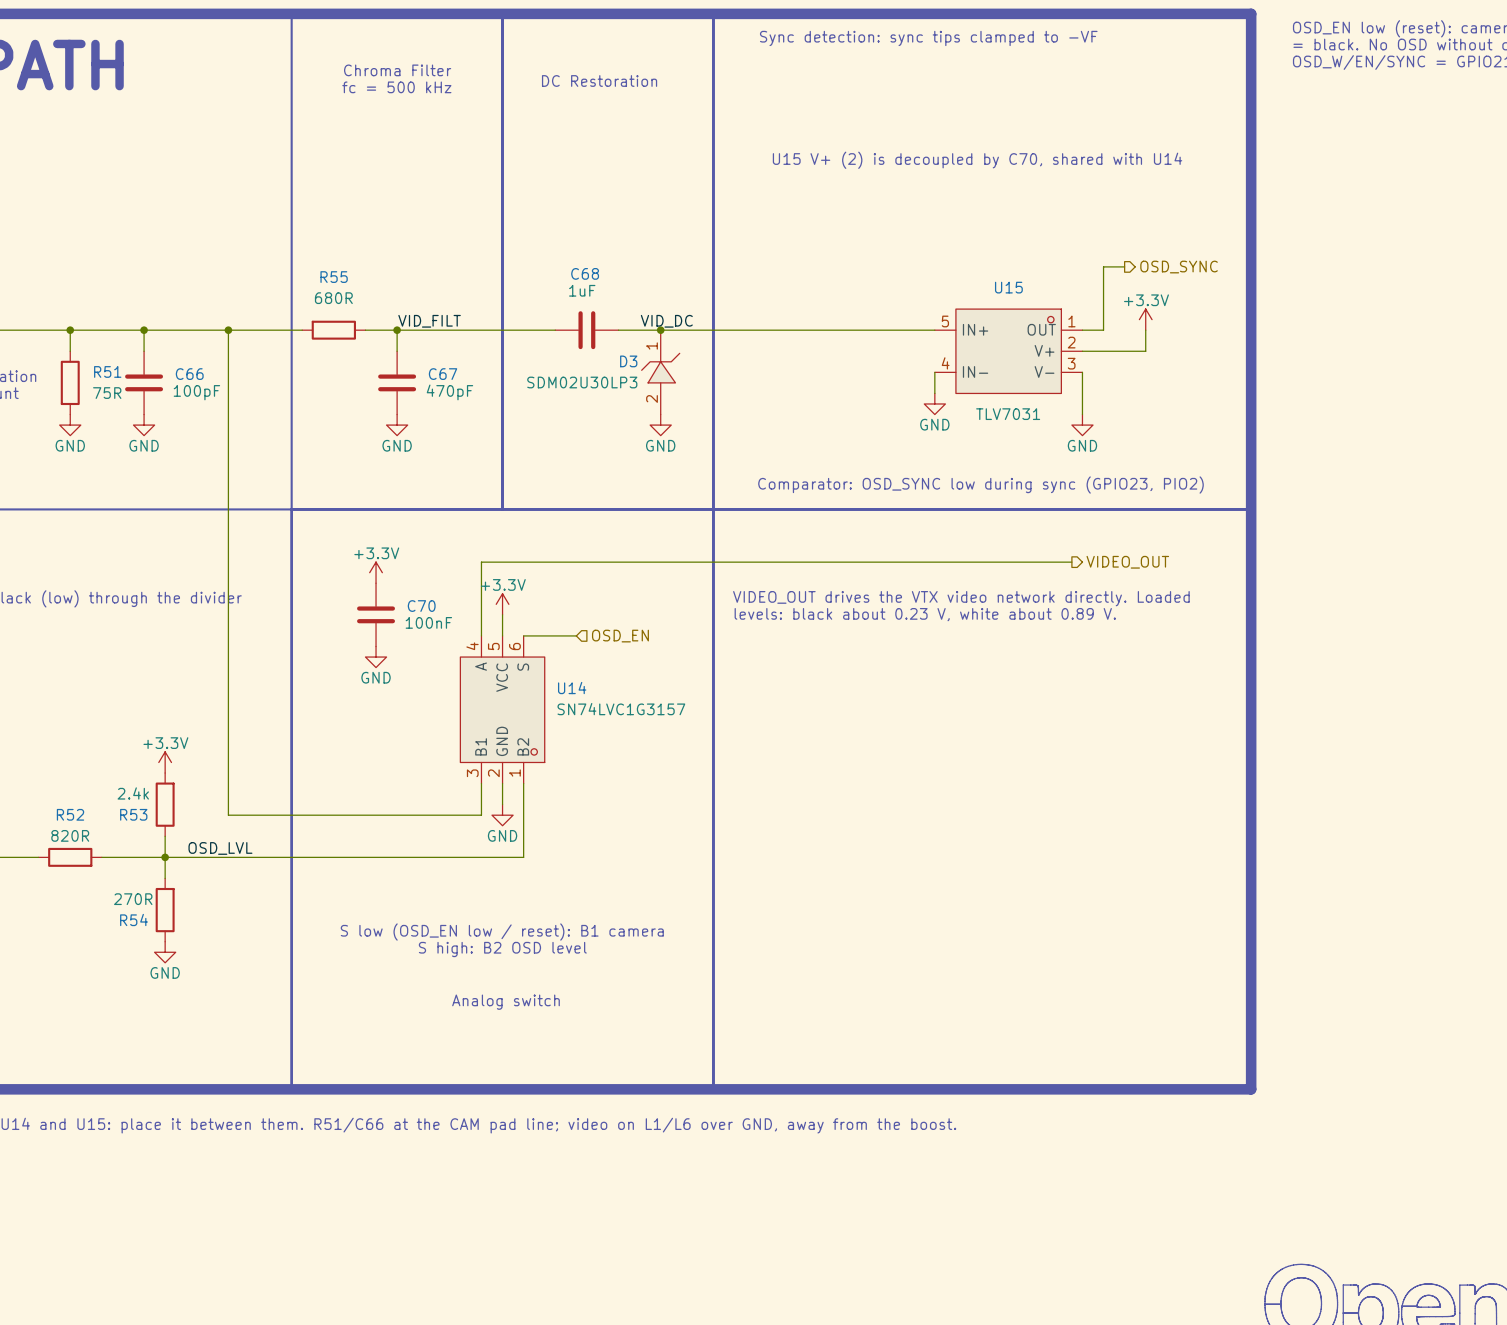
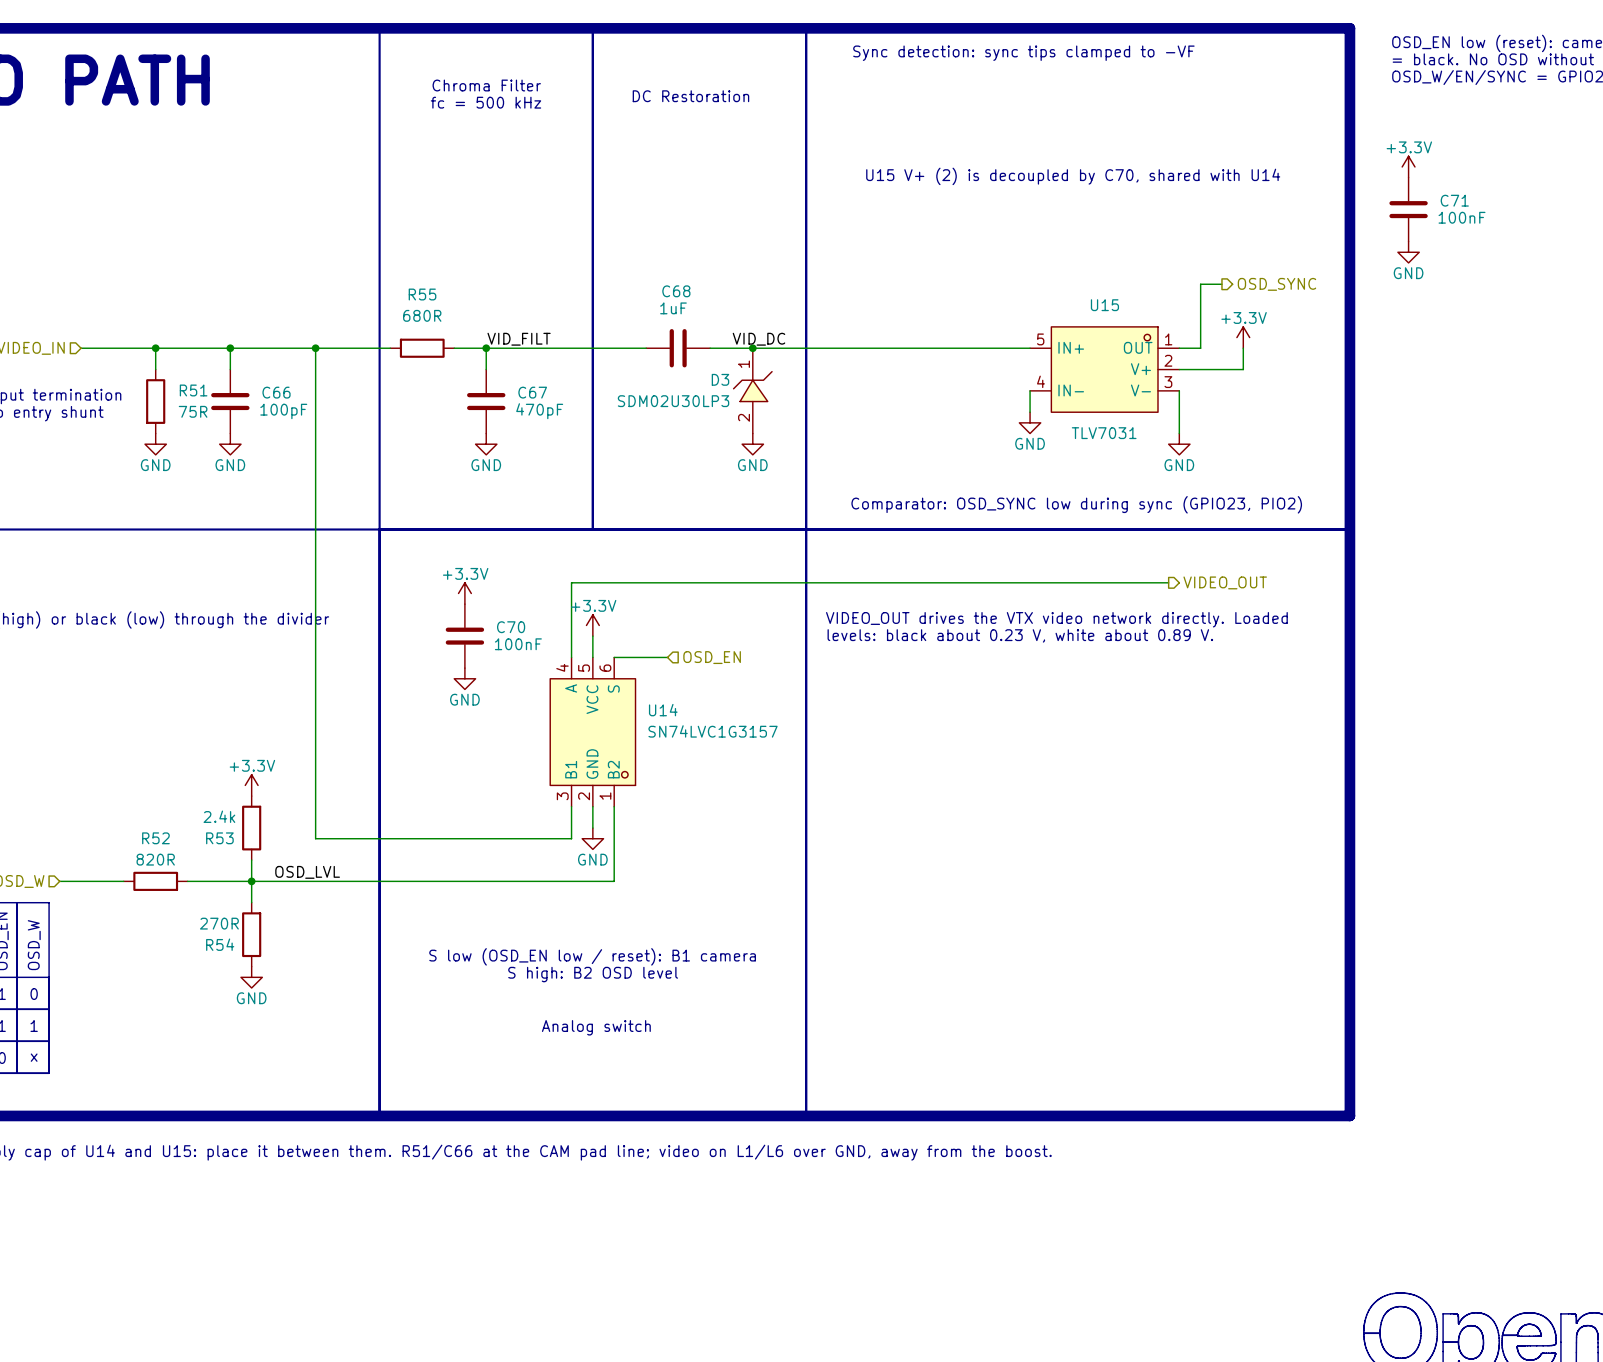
power symbol: none -> +3.3V (1408, 166)
C71: none -> 100nF (1408, 209)
power symbol: none -> GND (1408, 252)

